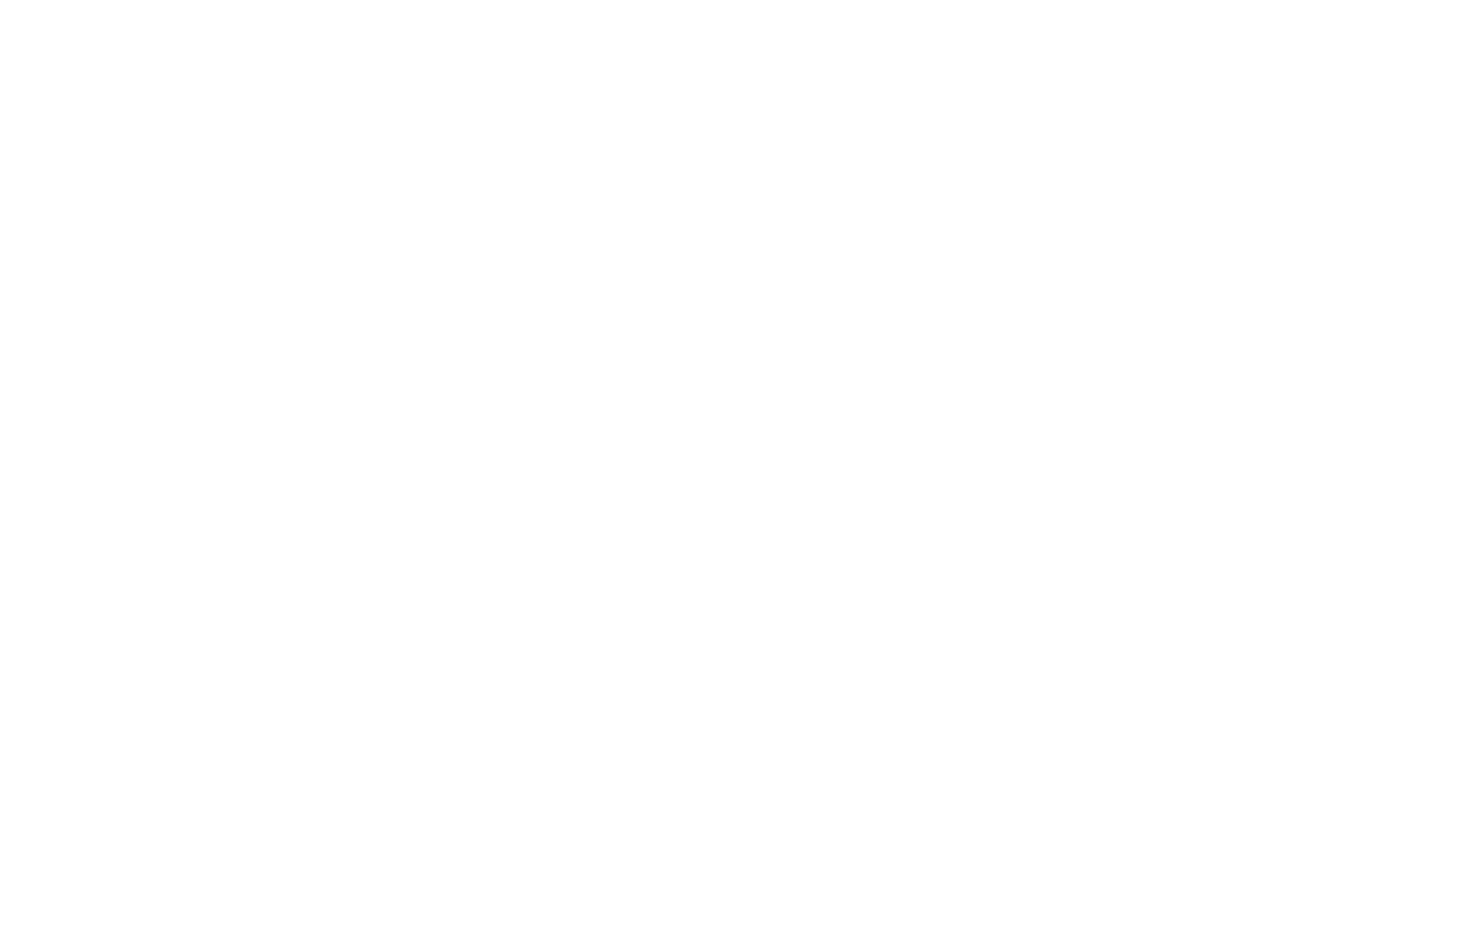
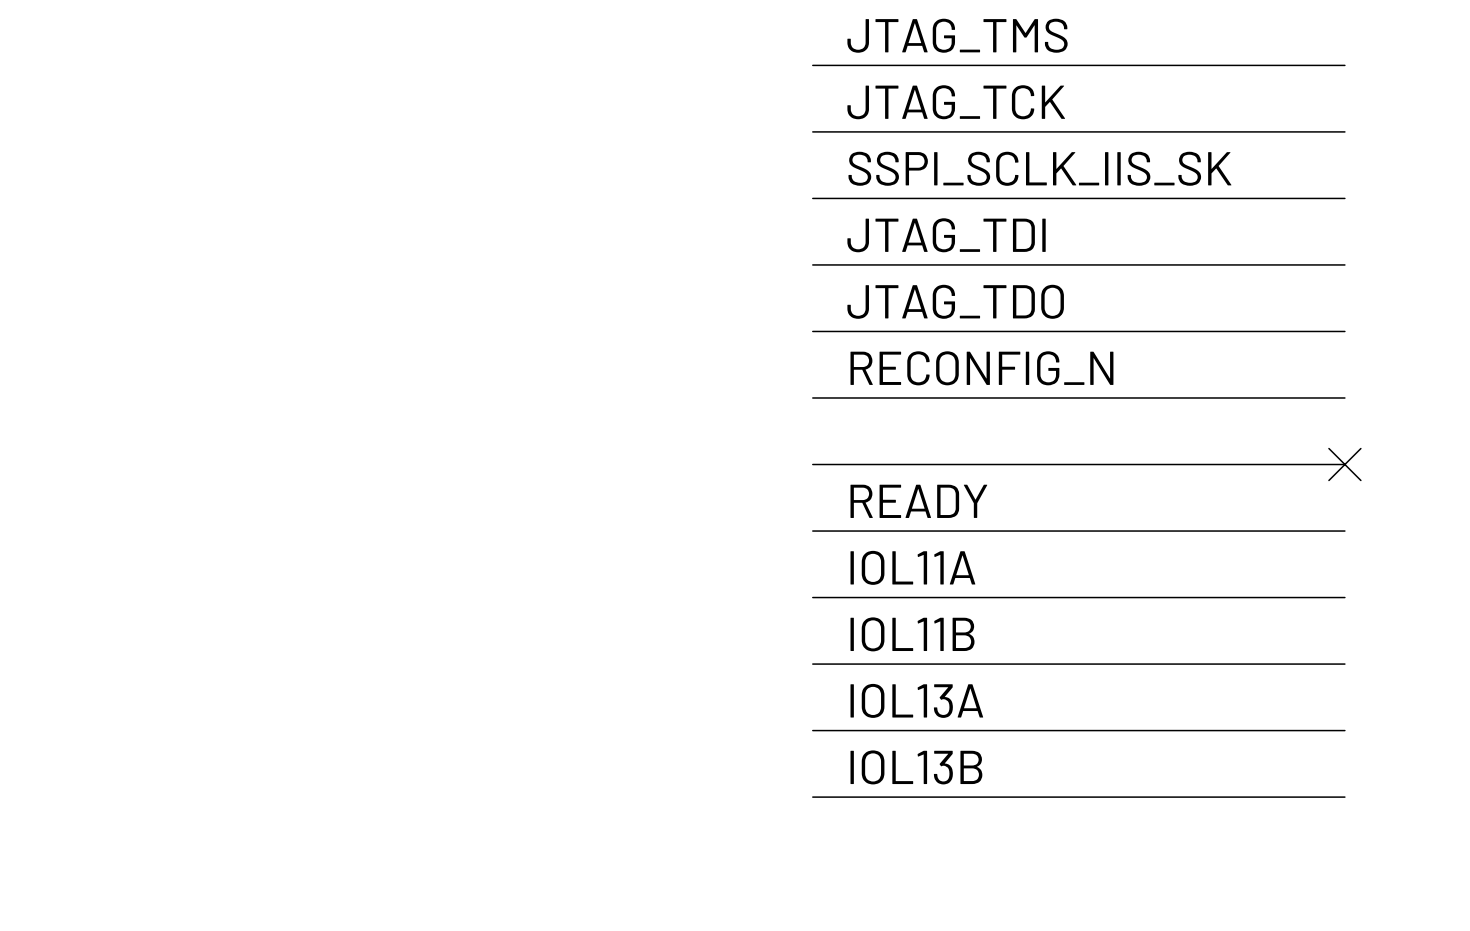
label: none -> JTAG_TMS (957, 35)
wire: none -> (812, 65) (1344, 65)
label: none -> JTAG_TCK (956, 102)
wire: none -> (812, 131) (1344, 131)
label: none -> SSPI_SCLK_IIS_SK (1039, 168)
wire: none -> (812, 198) (1344, 198)
label: none -> JTAG_TDI (946, 235)
wire: none -> (812, 264) (1344, 264)
label: none -> JTAG_TDO (955, 301)
wire: none -> (812, 331) (1344, 331)
label: none -> RECONFIG_N (981, 368)
wire: none -> (812, 397) (1344, 397)
wire: none -> (812, 464) (1344, 464)
no-connect mark: none -> (1344, 464)
label: none -> READY (918, 501)
wire: none -> (812, 531) (1344, 531)
label: none -> IOL11A (912, 567)
wire: none -> (812, 597) (1344, 597)
label: none -> IOL11B (912, 634)
wire: none -> (812, 664) (1344, 664)
label: none -> IOL13A (916, 700)
wire: none -> (812, 730) (1344, 730)
label: none -> IOL13B (916, 767)
wire: none -> (812, 797) (1344, 797)

